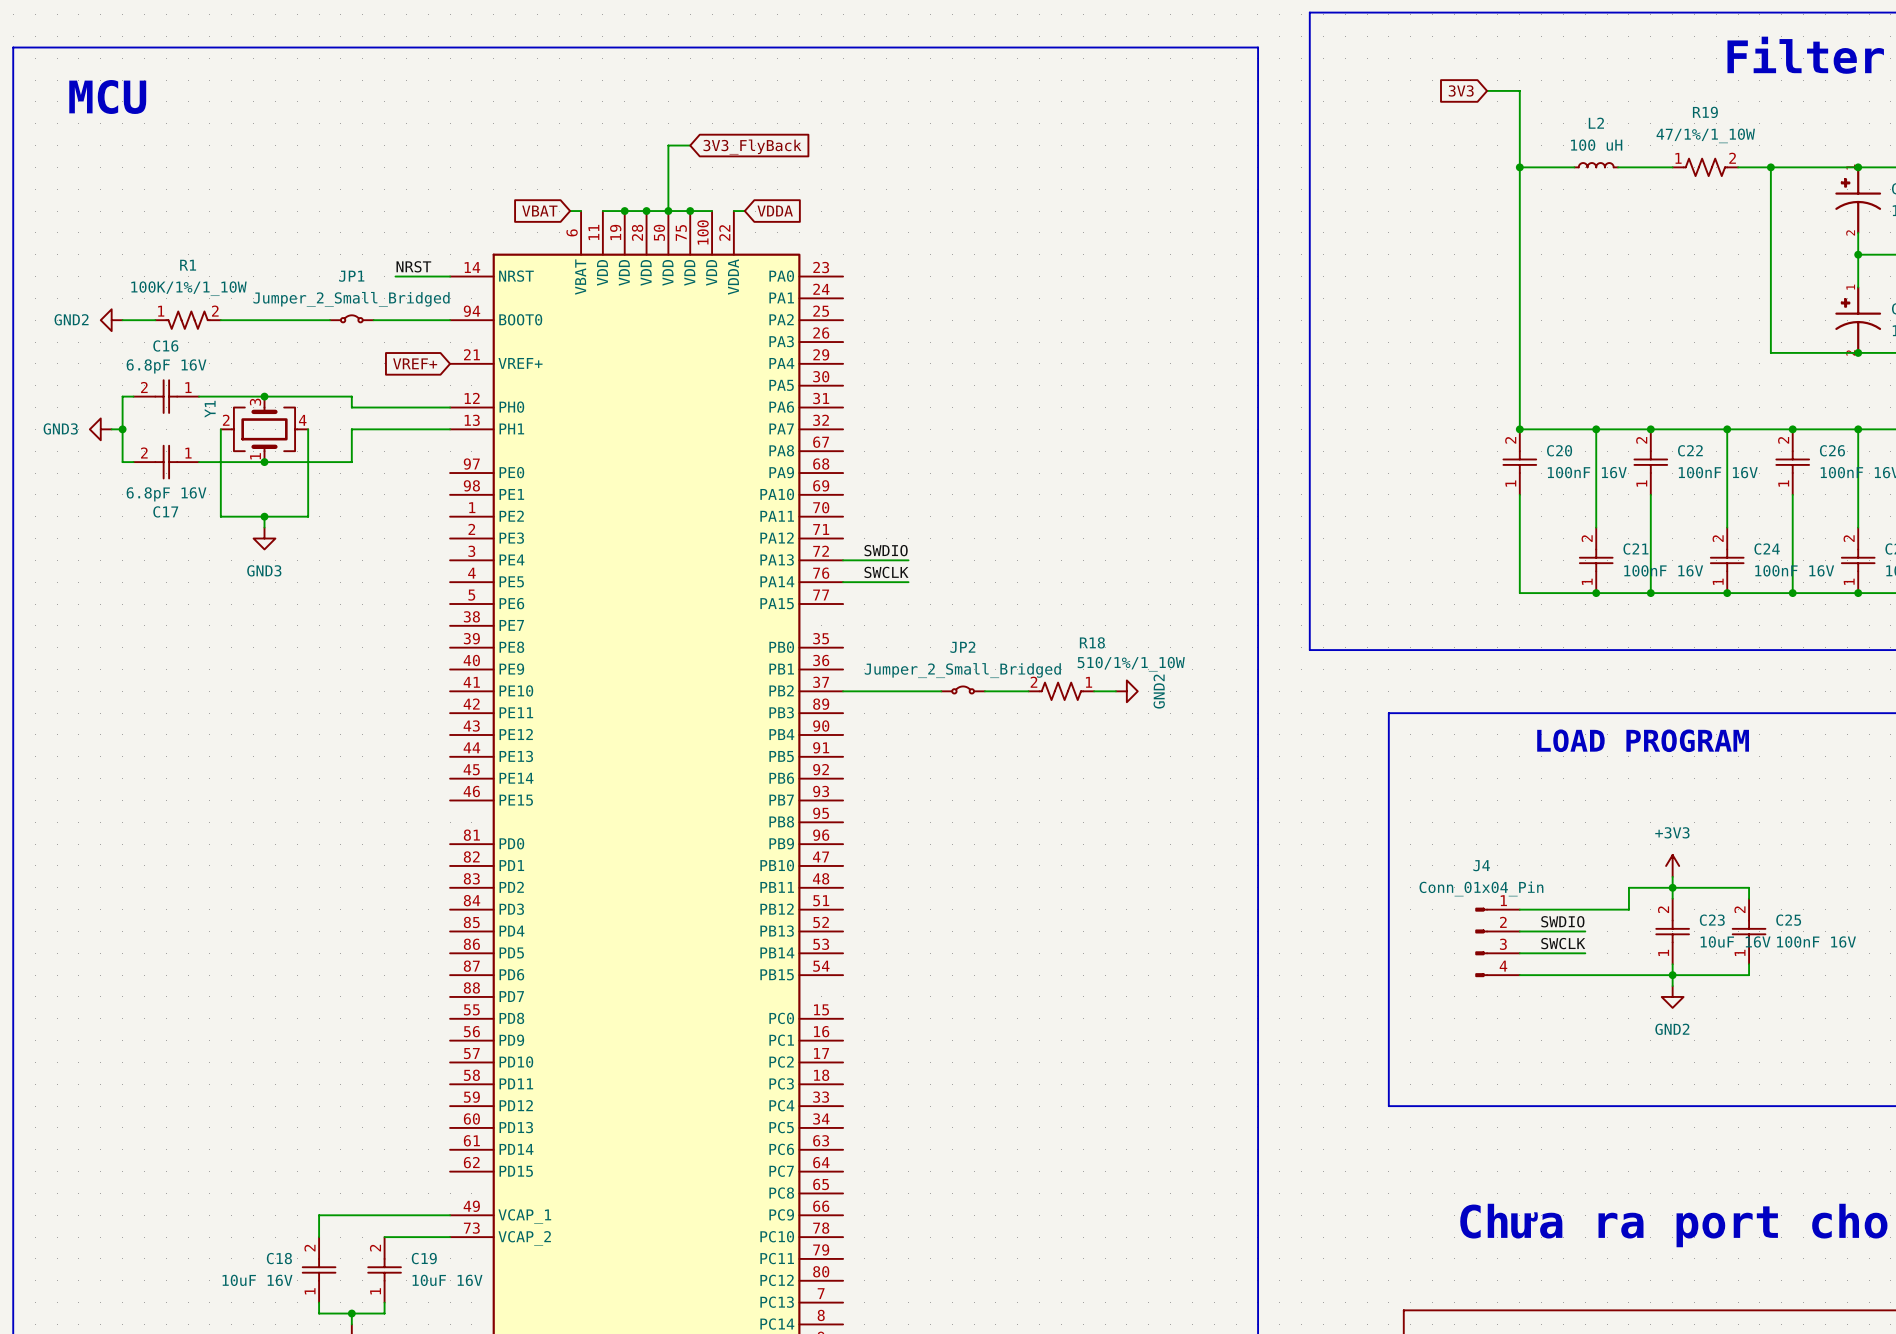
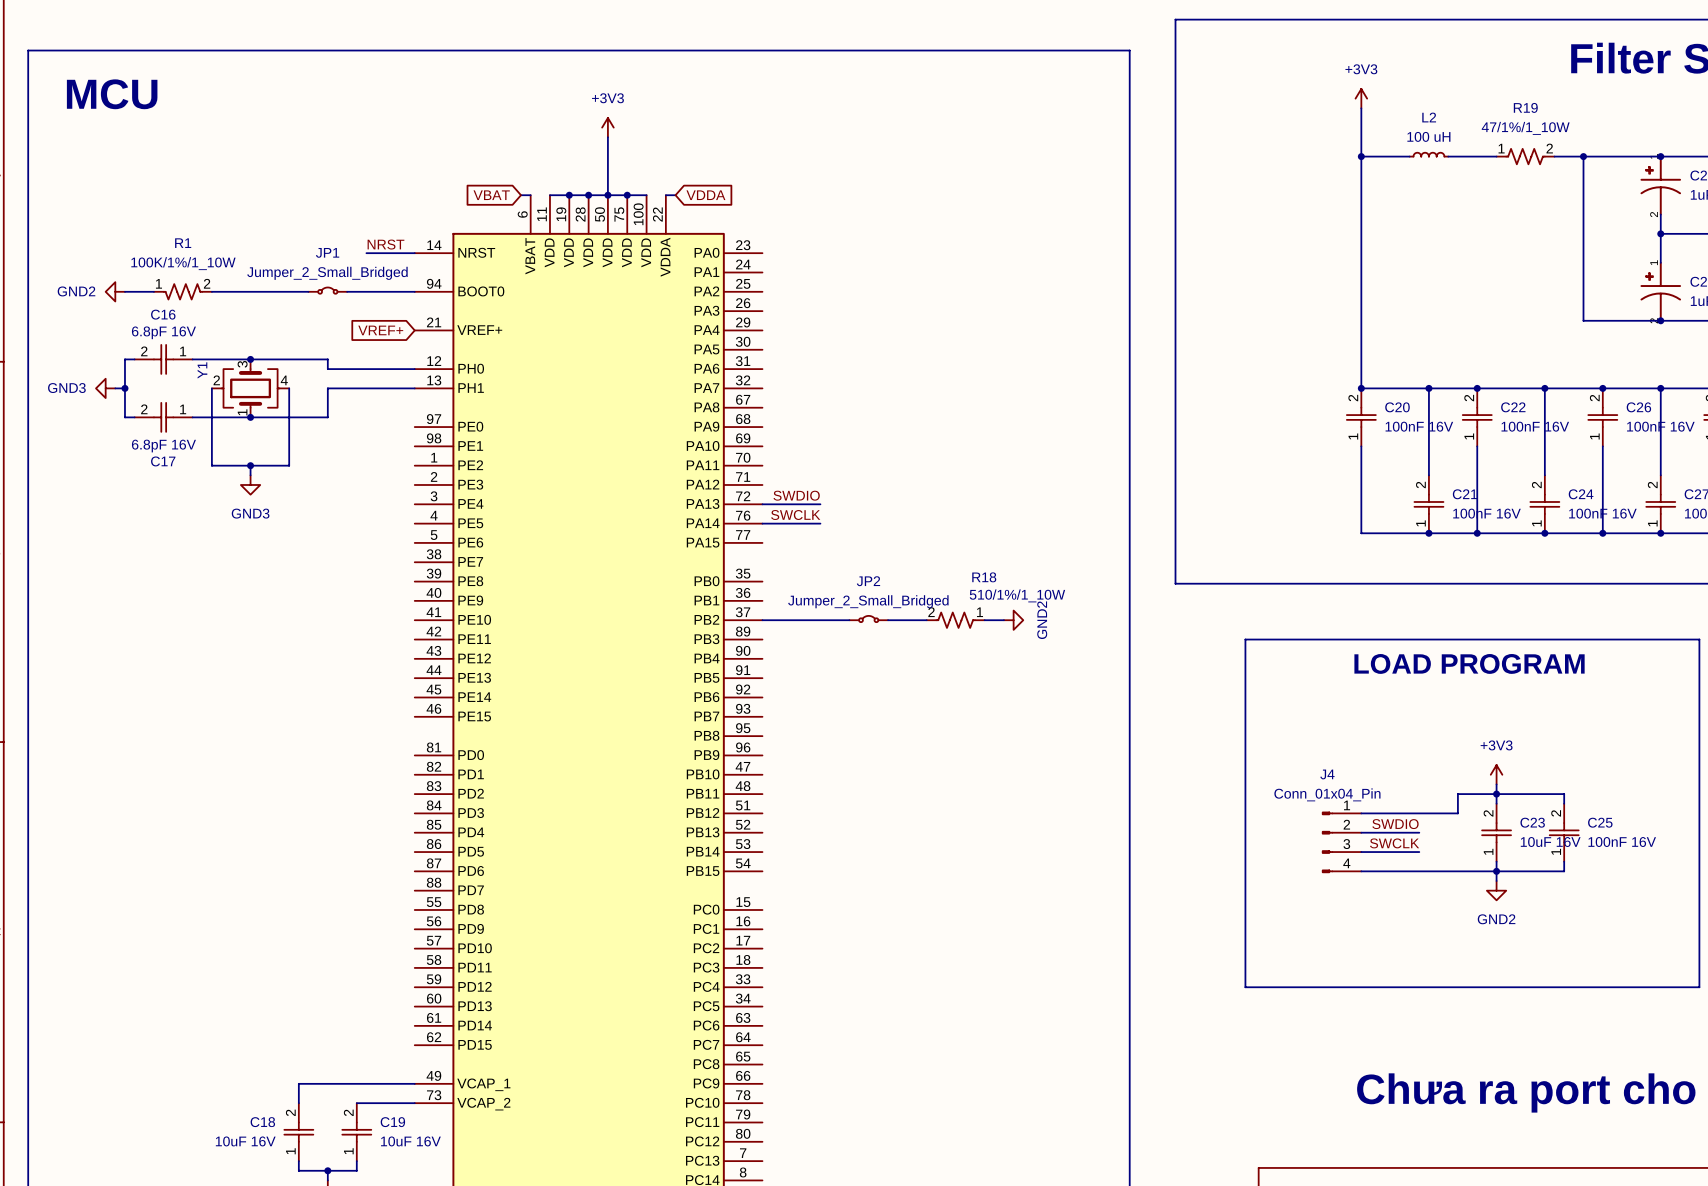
global label: 3V3 (1461, 90) -> none
wire: (1487, 90) (1519, 90) (1519, 112) -> none
power symbol: none -> +3V3 (1361, 98)
power symbol: none -> +3V3 (607, 127)
wire: (668, 145) (690, 145) -> none
global label: 3V3_FlyBack (752, 147) -> none

